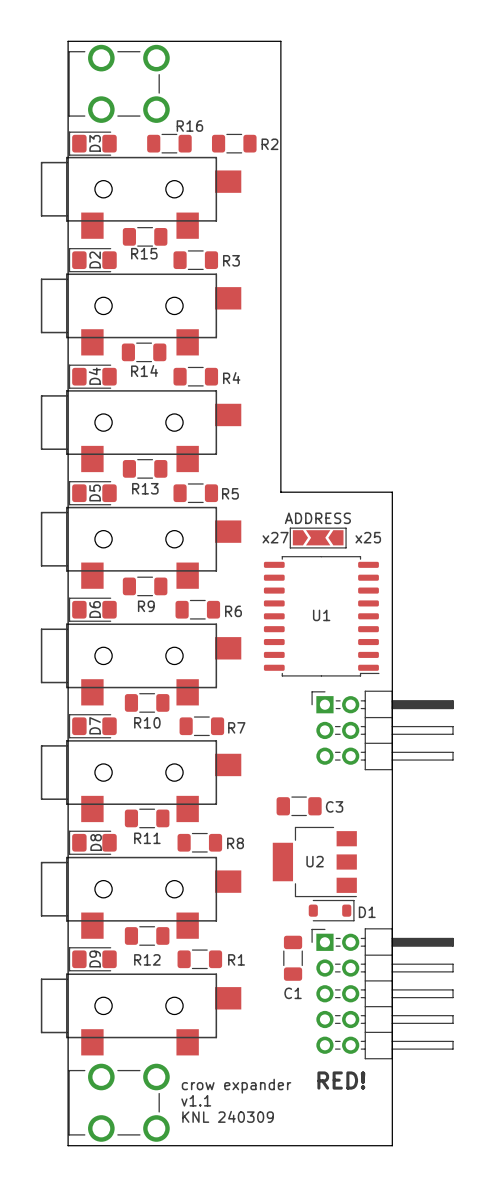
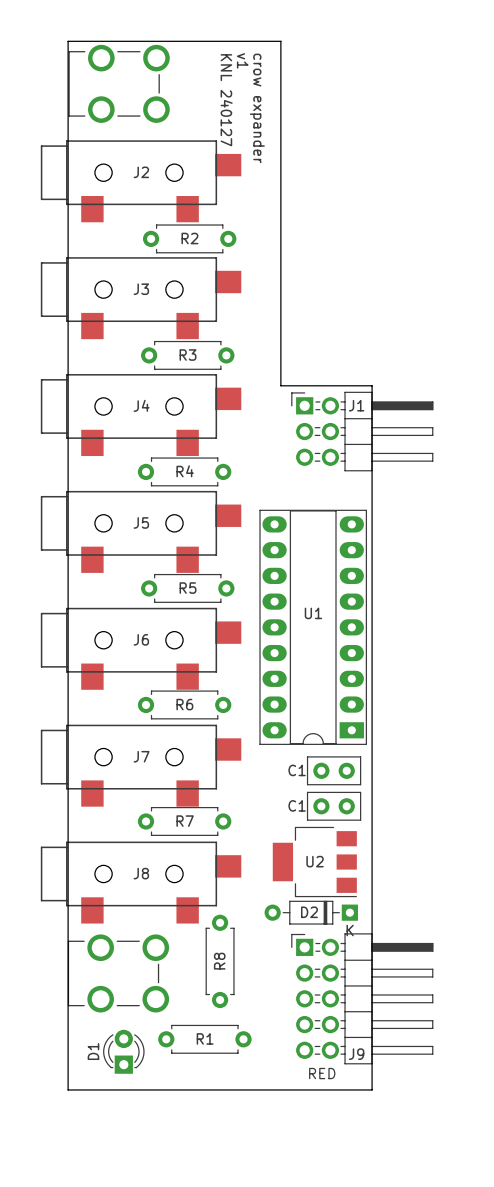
text: none -> v1 (242, 60)
text: none -> KNL 240127 (226, 100)
text: none -> crow expander (257, 108)
R2 footprint: [211, 133, 257, 154] -> [142, 224, 237, 254]
D3: (92, 143) -> none
R16: (169, 143) -> none
R2 name position: R2 (269, 144) -> R2 (189, 238)
J2: none -> (141, 181)
part: (141, 197) -> none
R15: (145, 236) -> none
D2 footprint: [68, 248, 117, 273] -> [264, 900, 358, 925]
R3 footprint: [173, 250, 219, 270] -> [141, 340, 235, 370]
R3 name position: R3 (231, 260) -> R3 (188, 355)
J3: none -> (141, 298)
part: (141, 314) -> none
R14: (144, 352) -> none
R4 footprint: [173, 366, 219, 387] -> [137, 457, 232, 487]
D4: (92, 376) -> none
R4 name position: R4 (231, 378) -> R4 (185, 471)
board edge: (280, 385) (280, 492) (392, 492) (392, 1145) (68, 1145) (68, 1089) -> (280, 385) (372, 385) (372, 1089) (68, 1089)
J4: none -> (141, 415)
part: (141, 431) -> none
J1: none -> (362, 431)
R13: (145, 468) -> none
R5 footprint: [173, 483, 219, 504] -> [141, 573, 235, 603]
D5: (92, 493) -> none
R5 name position: R5 (230, 493) -> R5 (188, 588)
text: ADDRESS (317, 518) -> none
J5: none -> (141, 531)
text: x27 (275, 537) -> none
text: x25 (368, 537) -> none
part: (318, 538) -> none
part: (141, 547) -> none
U1 footprint: [263, 556, 380, 677] -> [259, 509, 368, 745]
R9: (145, 586) -> none
R6 footprint: [175, 599, 221, 620] -> [137, 690, 232, 720]
D6: (92, 609) -> none
R6 name position: R6 (233, 611) -> R6 (184, 704)
J6: none -> (141, 648)
part: (141, 664) -> none
R10: (147, 702) -> none
R7 footprint: [179, 716, 225, 737] -> [137, 806, 232, 836]
D7: (92, 726) -> none
R7 name position: R7 (236, 727) -> R7 (185, 821)
part: (382, 730) -> none
J7: none -> (141, 765)
C1: none -> (334, 770)
part: (141, 781) -> none
C3: (299, 806) -> none
C1: none -> (334, 806)
R11: (147, 818) -> none
R8 footprint: [177, 832, 223, 853] -> [205, 914, 235, 1009]
D8: (92, 842) -> none
R8 name position: R8 (235, 843) -> R8 (219, 961)
J8: none -> (141, 882)
part: (141, 897) -> none
D1 footprint: [308, 899, 355, 922] -> [103, 1029, 145, 1074]
D1 name position: D1 (367, 912) -> D1 (93, 1051)
R12: (147, 935) -> none
R1 footprint: [177, 949, 223, 970] -> [158, 1024, 252, 1054]
C1: (293, 958) -> none
D9: (92, 959) -> none
R1 name position: R1 (236, 959) -> R1 (205, 1038)
part: (382, 993) -> none
J9: none -> (362, 998)
part: (141, 1014) -> none
text: RED! (341, 1080) -> RED (322, 1073)
text: crow expander (236, 1086) -> none
text: v1.1 (196, 1100) -> none
part position: (119, 1102) -> (118, 973)
text: KNL 240309 (228, 1116) -> none

